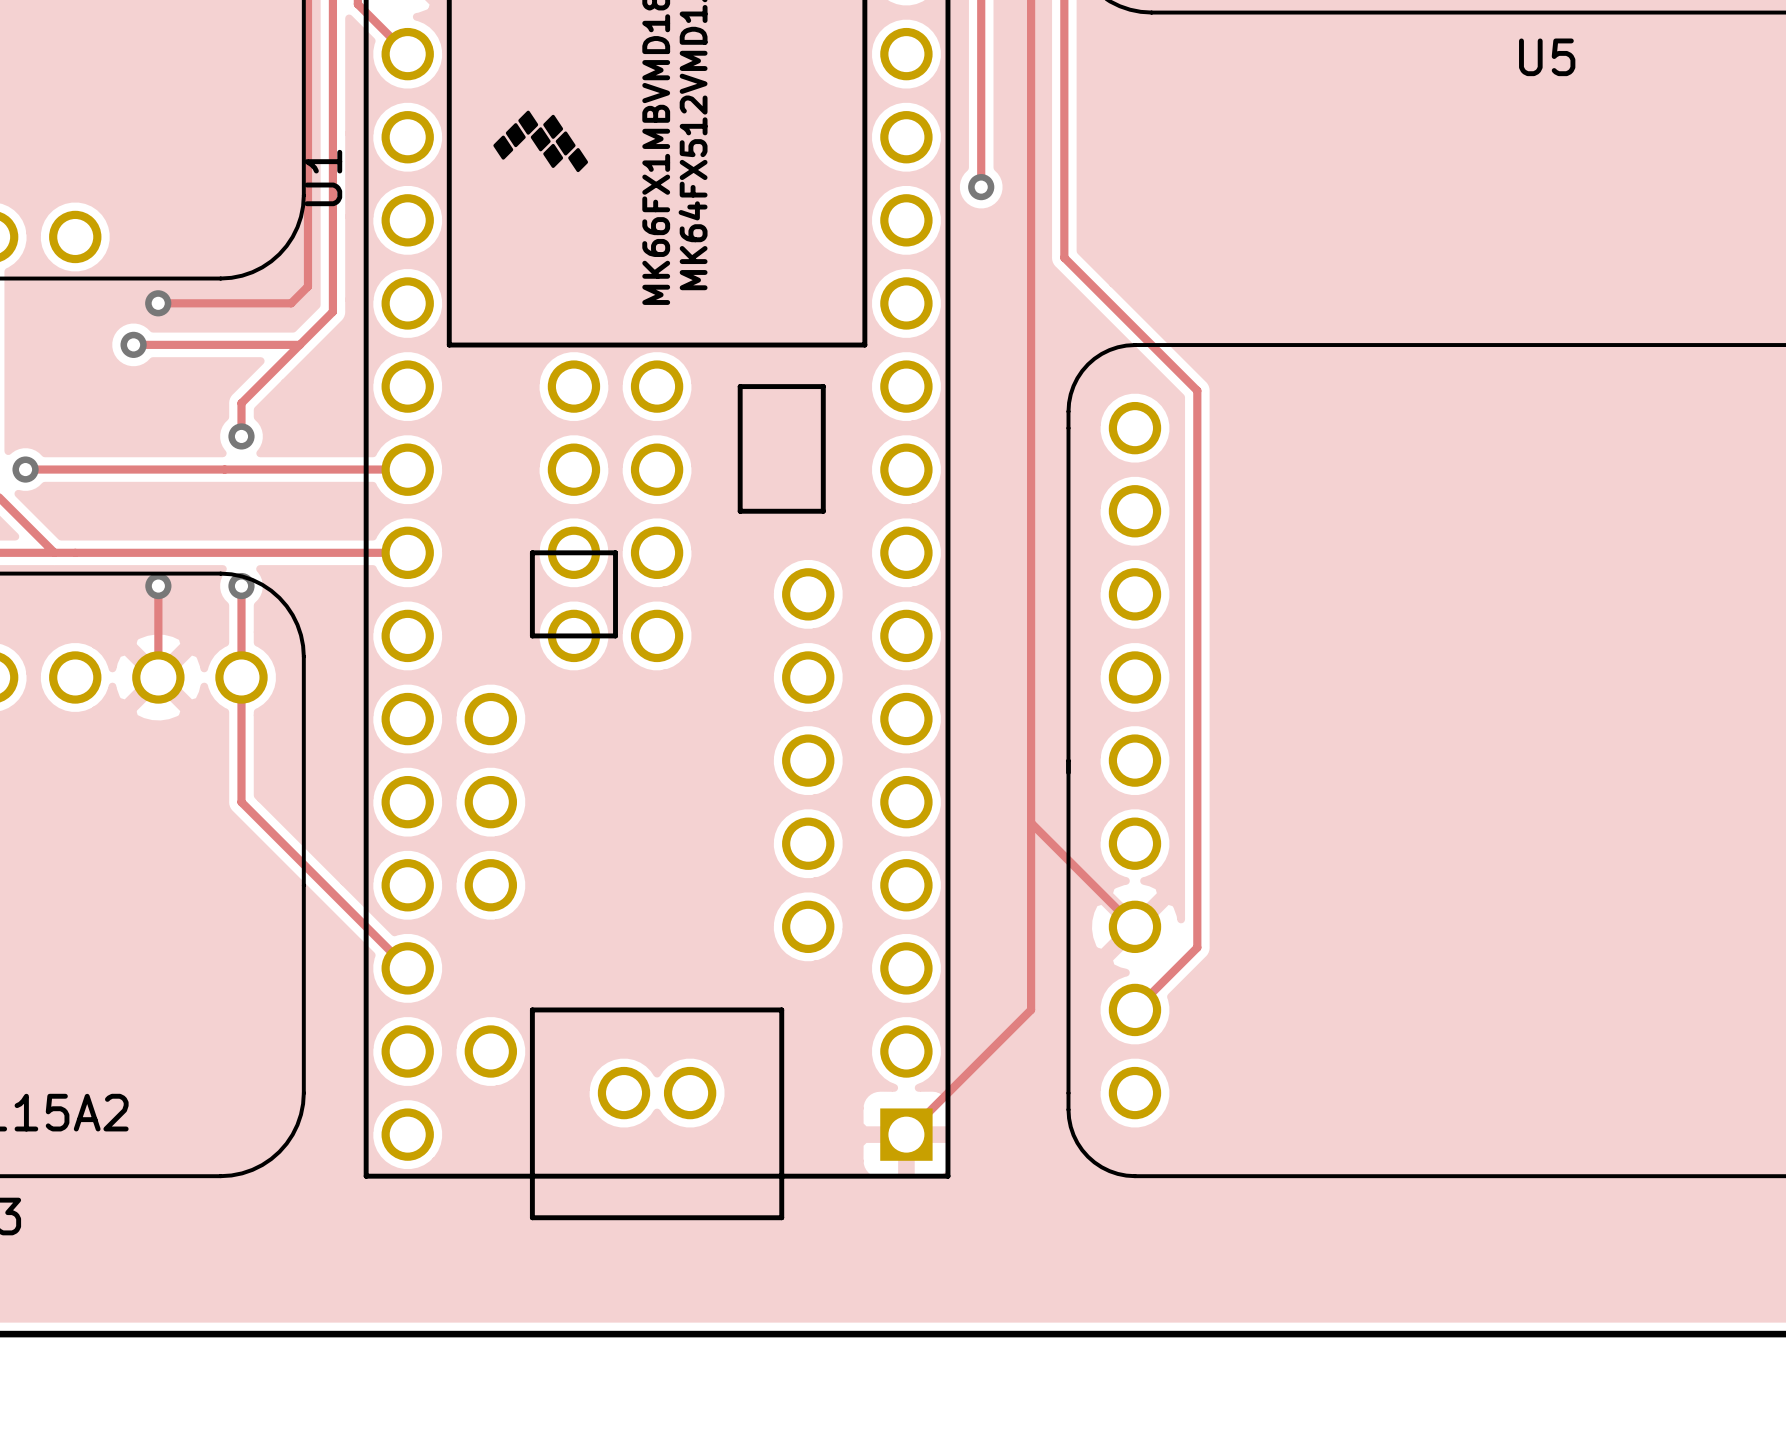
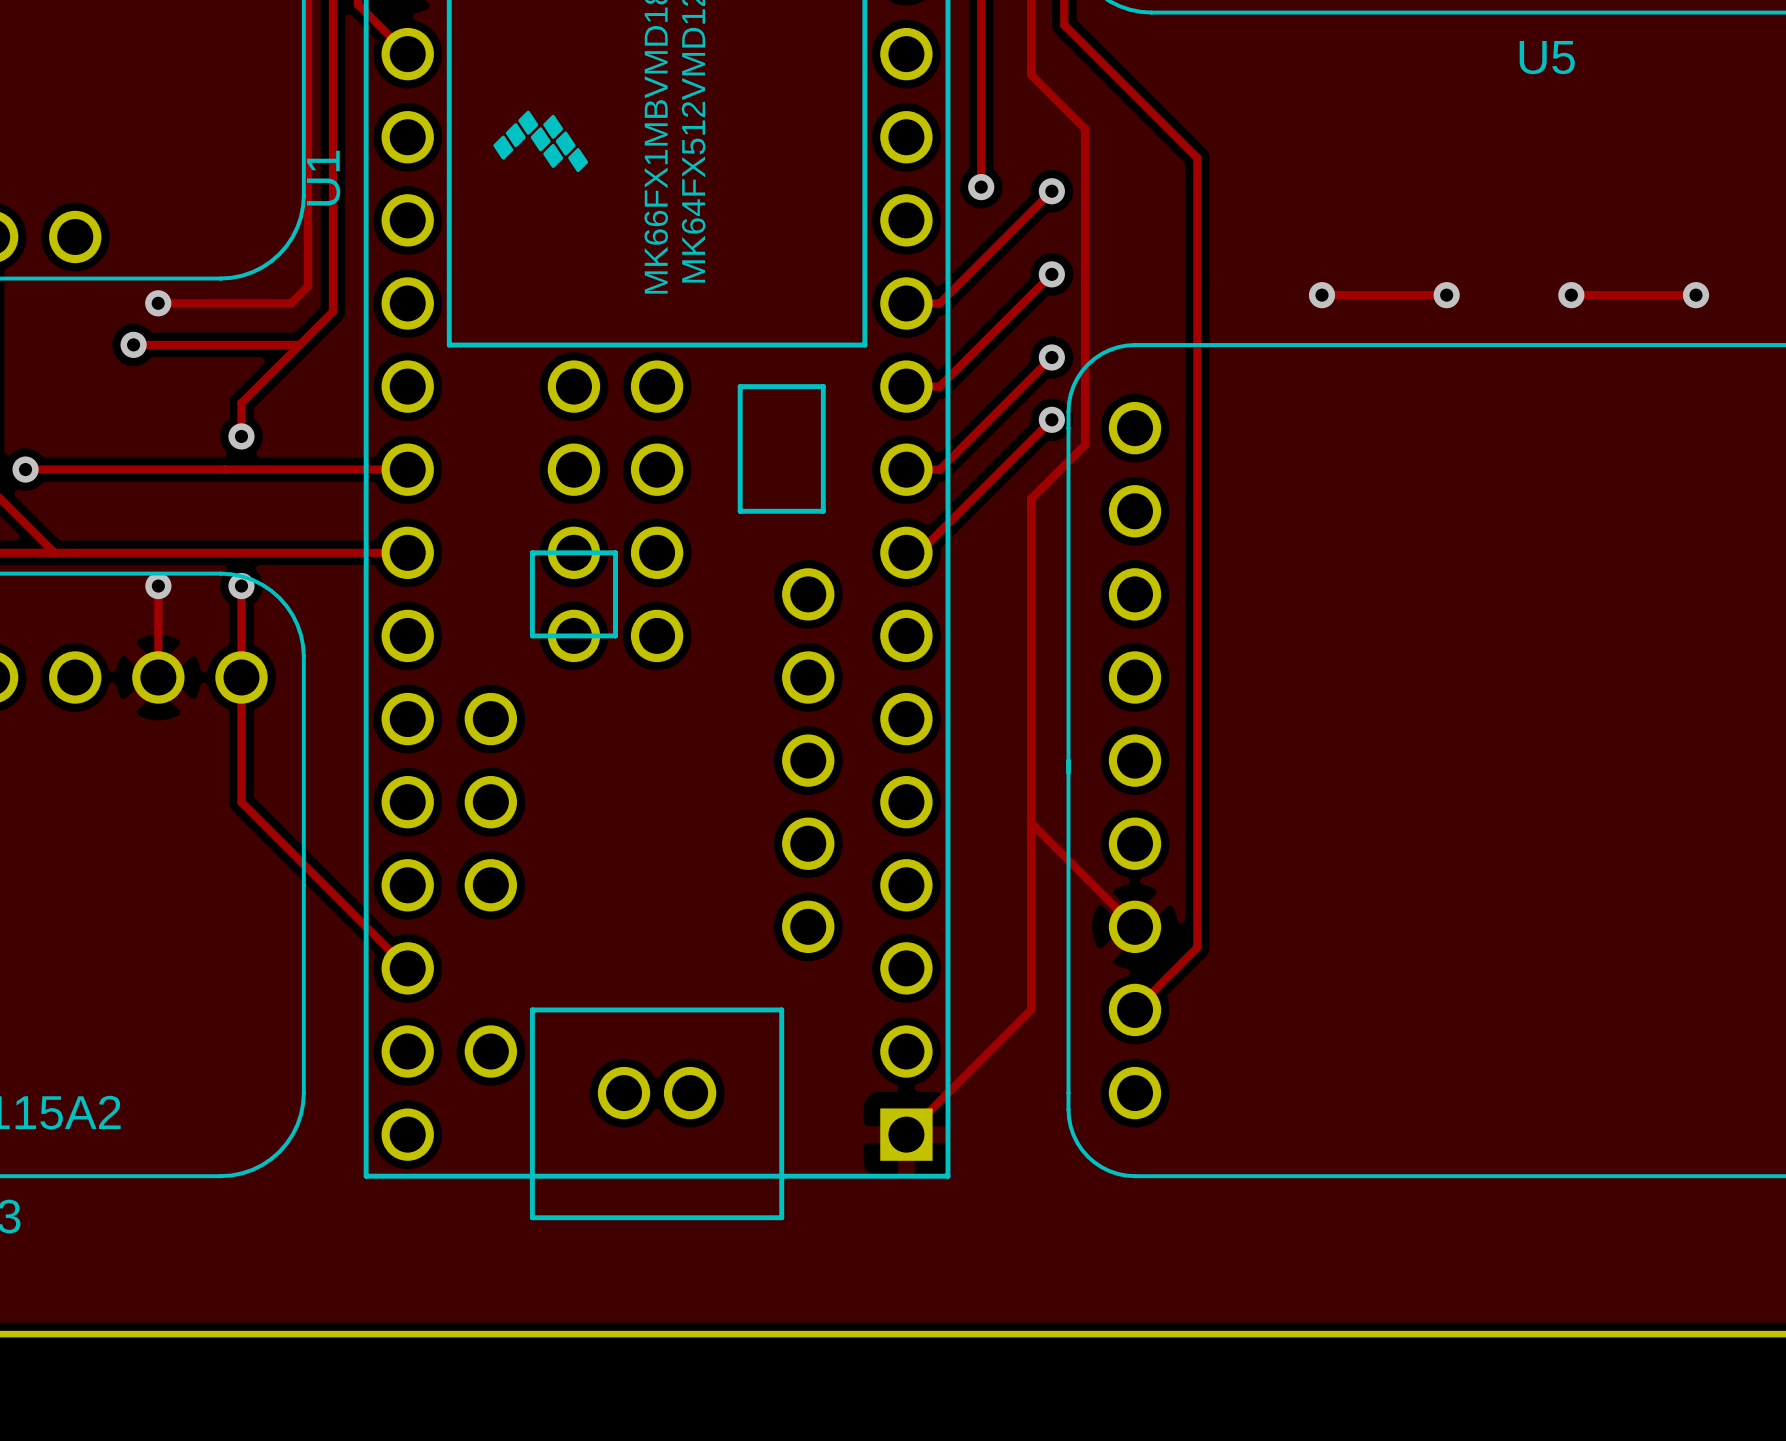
track: (1064, 25) (1064, 257) (1197, 390) -> (1064, 25) (1197, 158) (1197, 390)
track: (1031, 74) (1031, 498) -> (1031, 74) (1085, 128) (1085, 444) (1031, 498)
track: none -> (1051, 191) (939, 303) (906, 303)
via: none -> (1051, 191)
track: none -> (1051, 274) (939, 386) (906, 386)
via: none -> (1051, 274)
track: none -> (1321, 295) (1446, 295)
via: none -> (1321, 295)
via: none -> (1446, 295)
track: none -> (1571, 295) (1696, 295)
via: none -> (1571, 295)
via: none -> (1696, 295)
track: none -> (1051, 357) (939, 469) (906, 469)
via: none -> (1051, 357)
track: none -> (1051, 419) (918, 552) (906, 552)
via: none -> (1051, 419)

